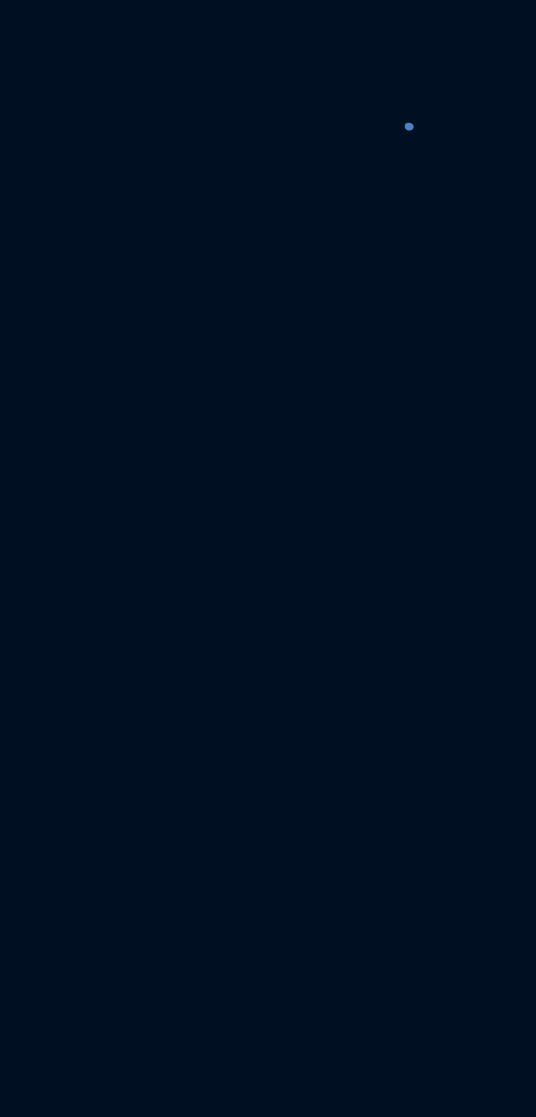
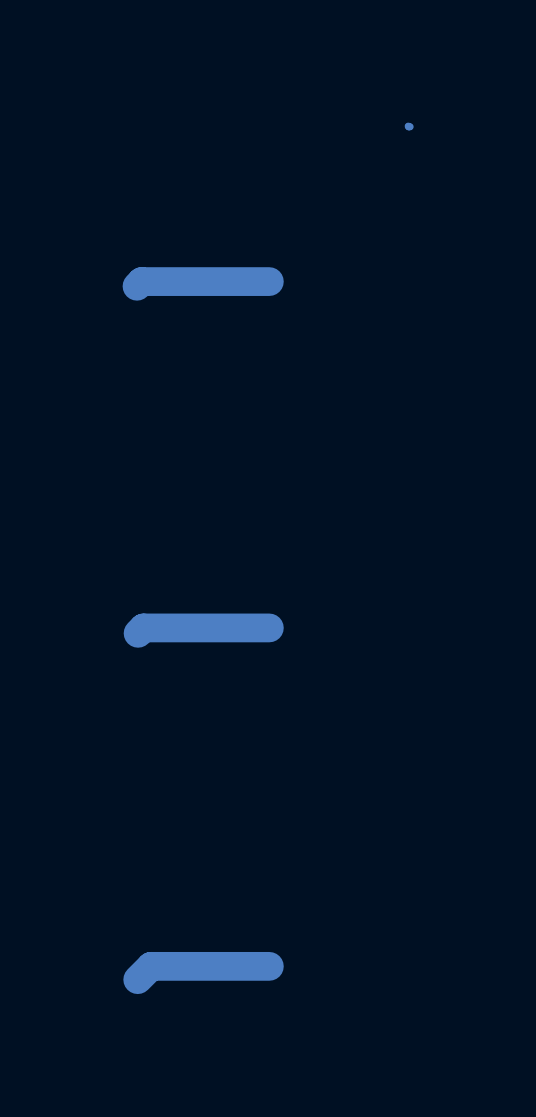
bottom track: none -> (269, 281) (141, 281) (137, 286)
bottom track: none -> (269, 627) (143, 627) (138, 633)
bottom track: none -> (269, 966) (151, 966) (137, 979)

